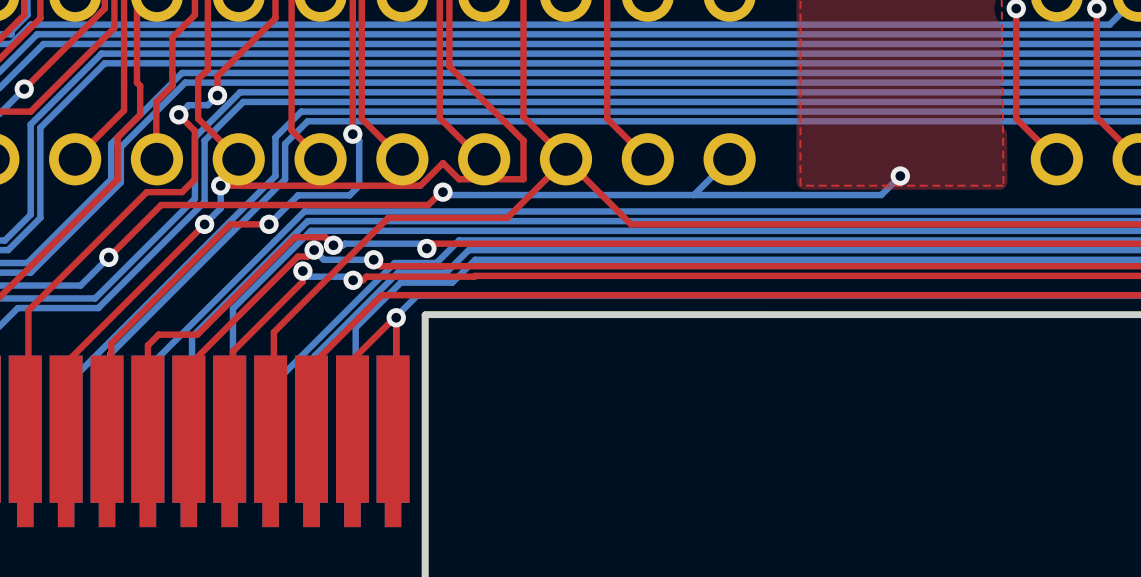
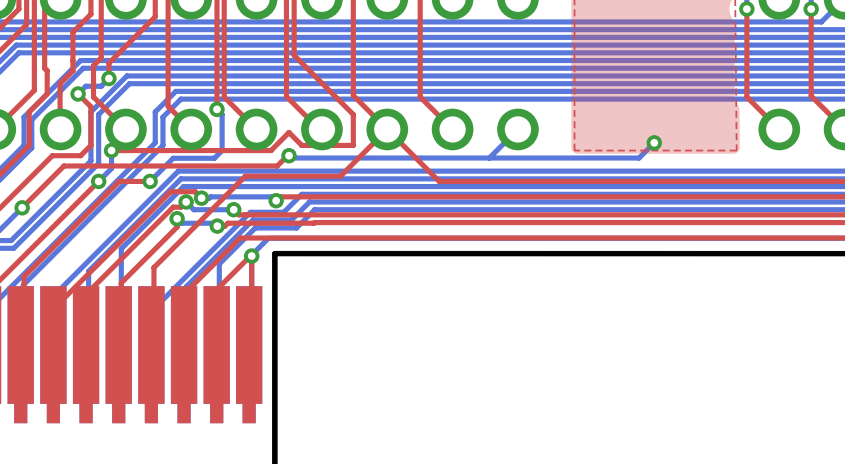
top track: (197, 334) (158, 334) (147, 345) (147, 429) -> (92, 269) (55, 306)

